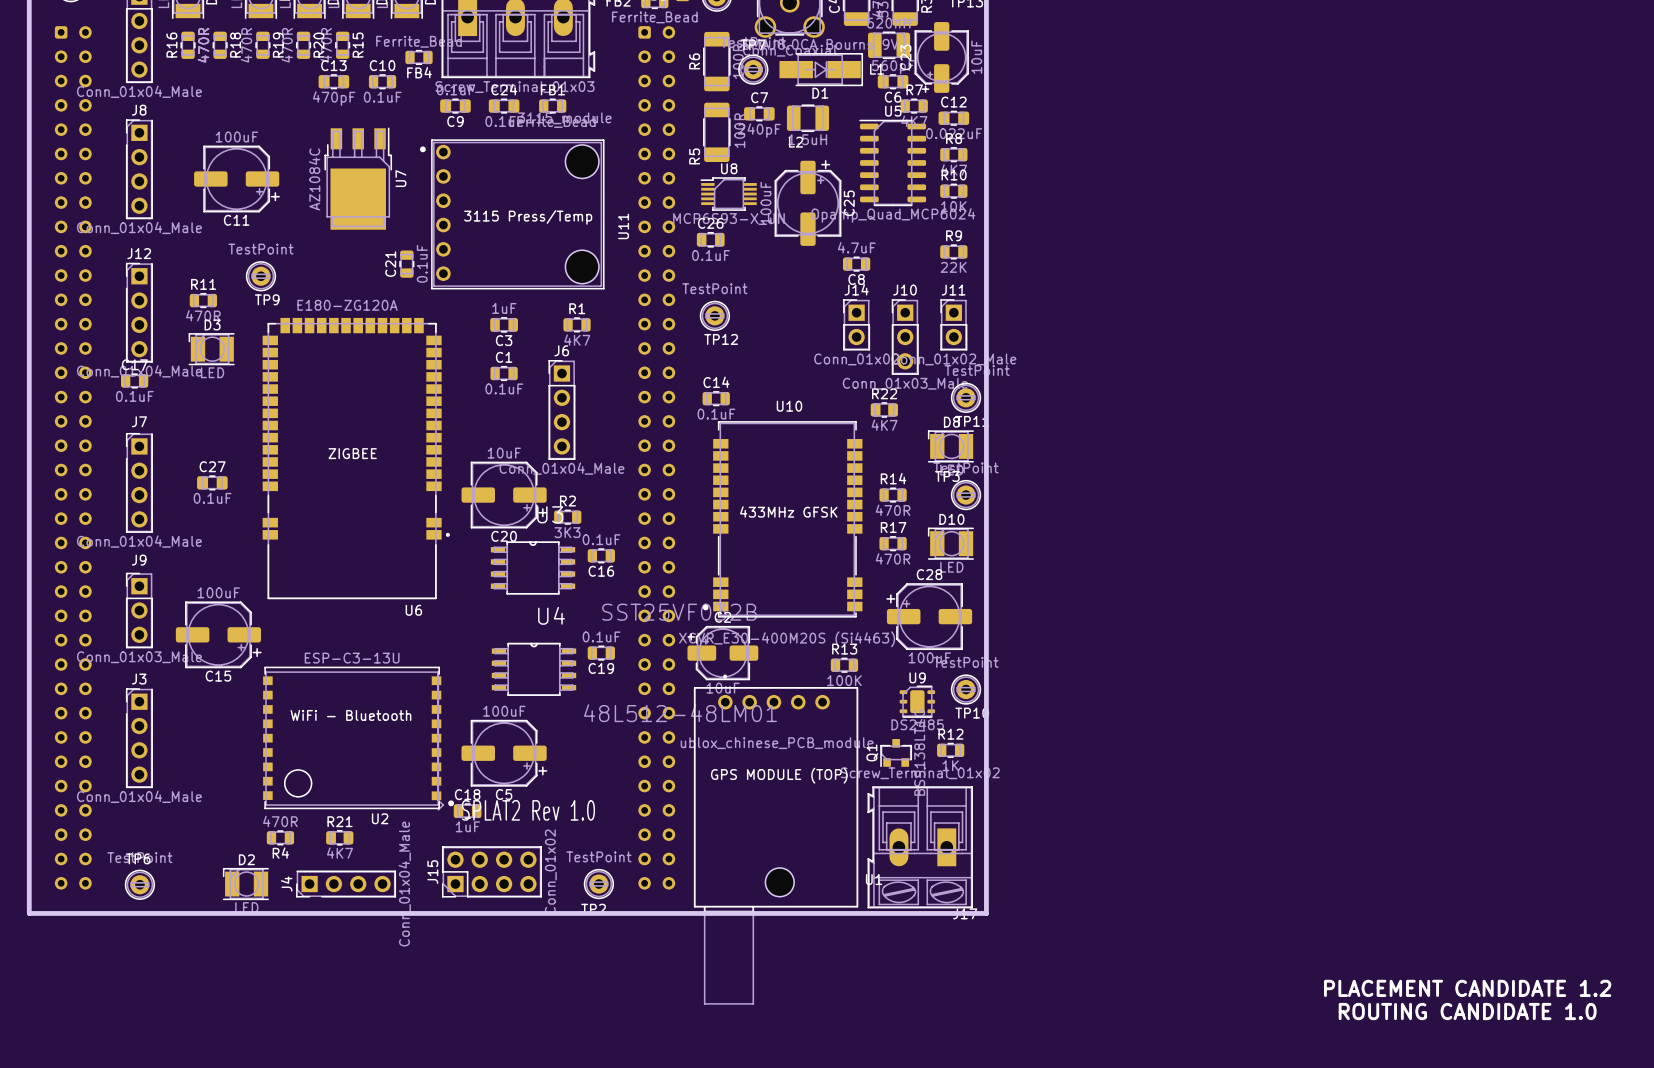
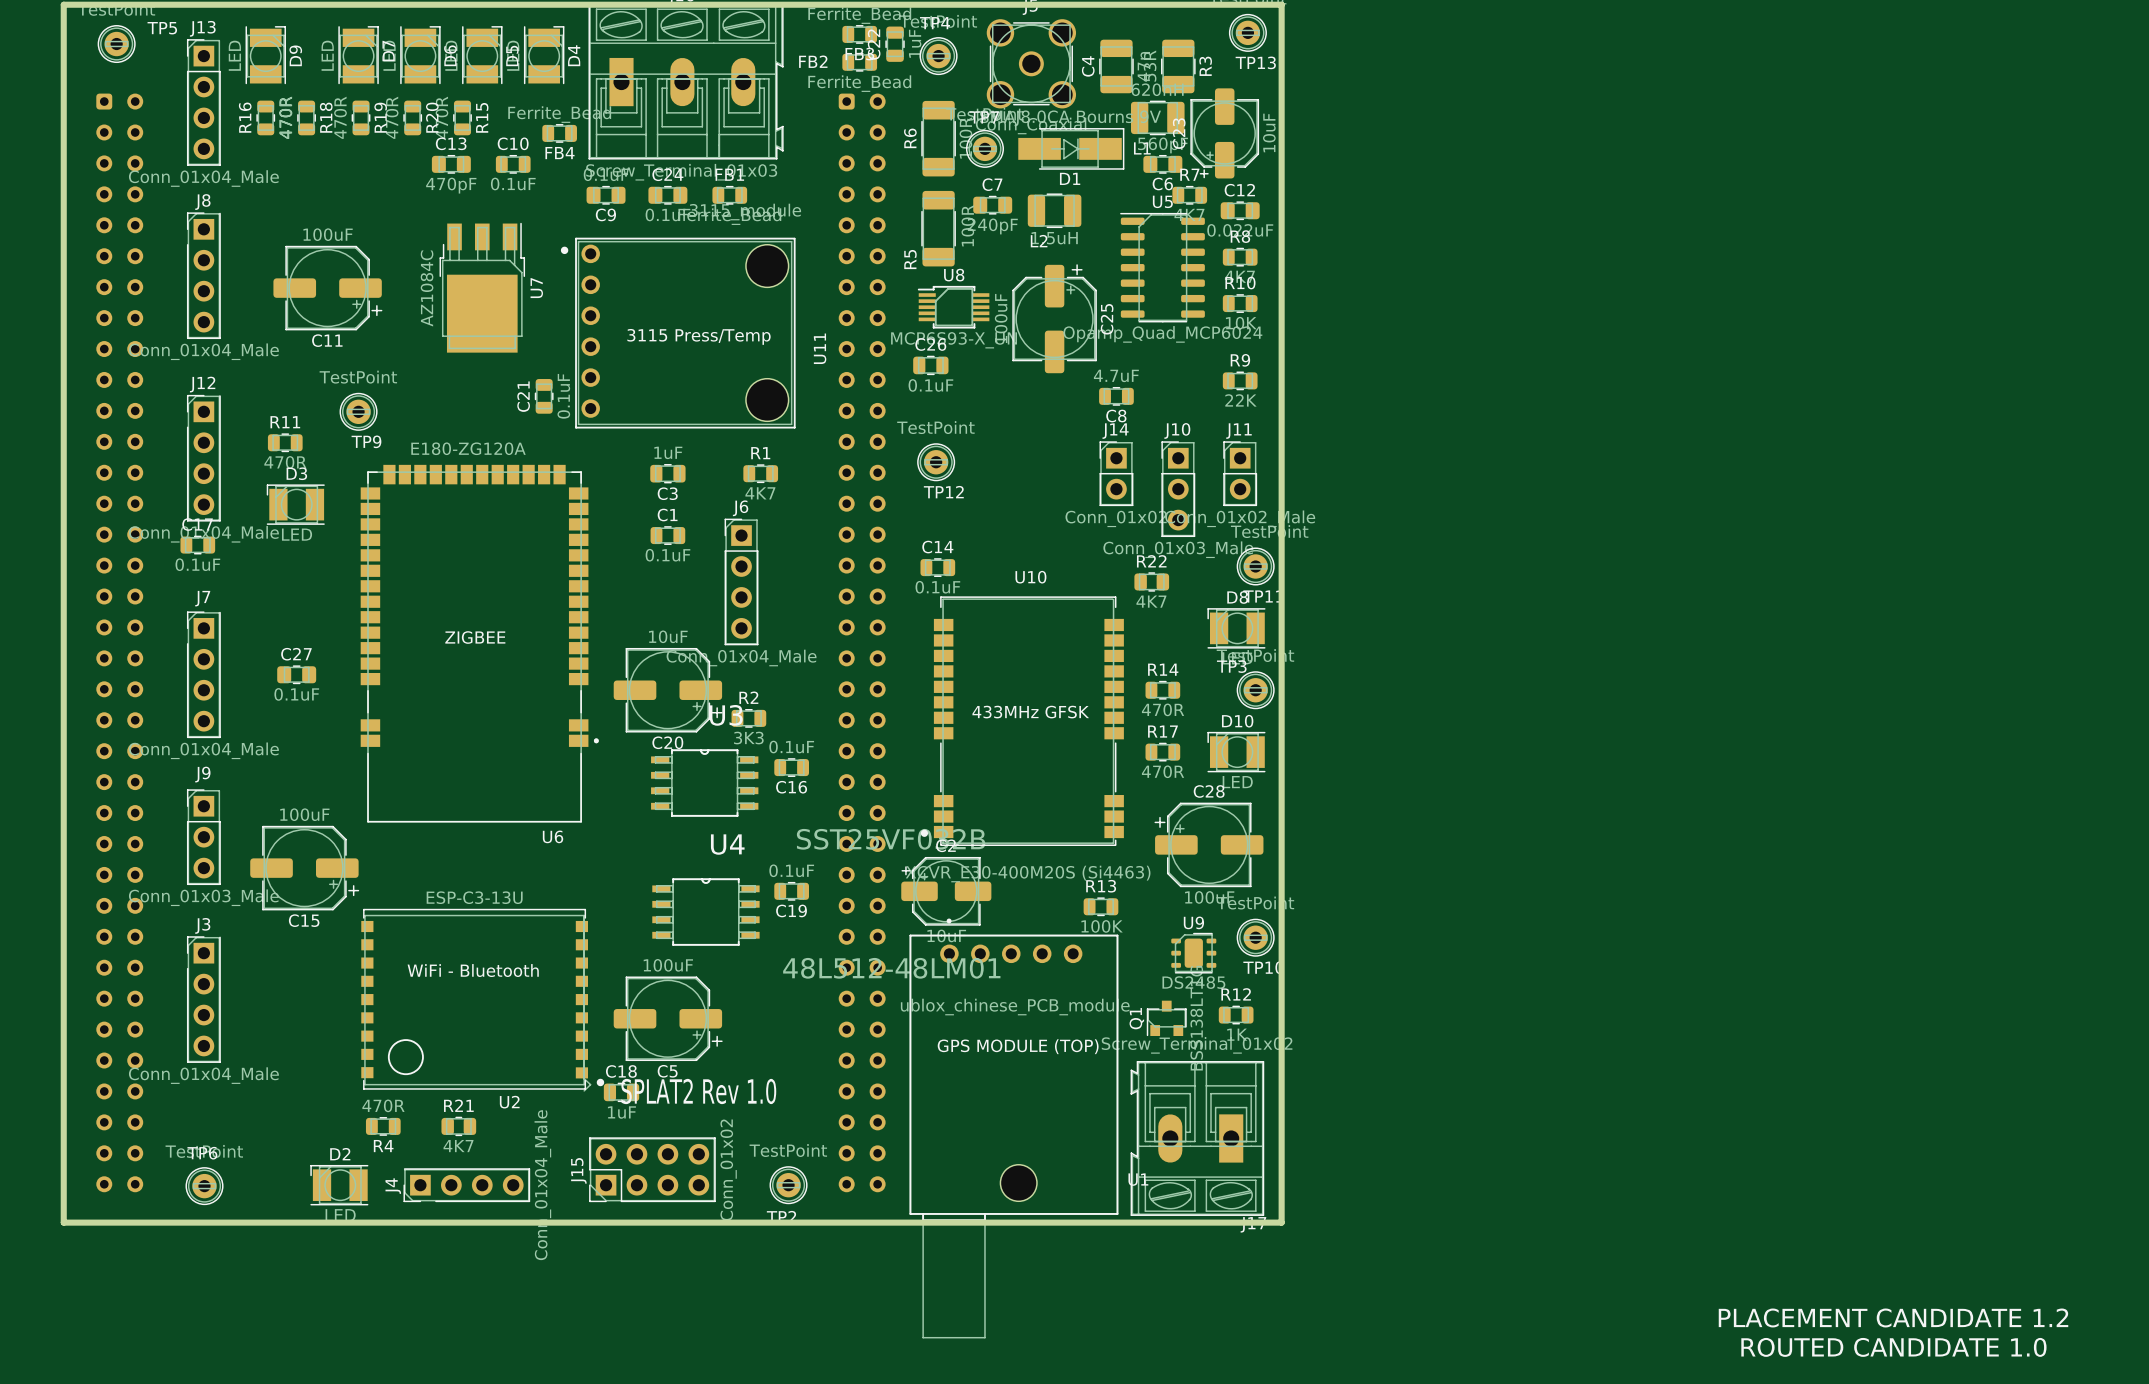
text: ROUTING CANDIDATE 1.0 (1467, 1011) -> ROUTED CANDIDATE 1.0 (1893, 1347)

